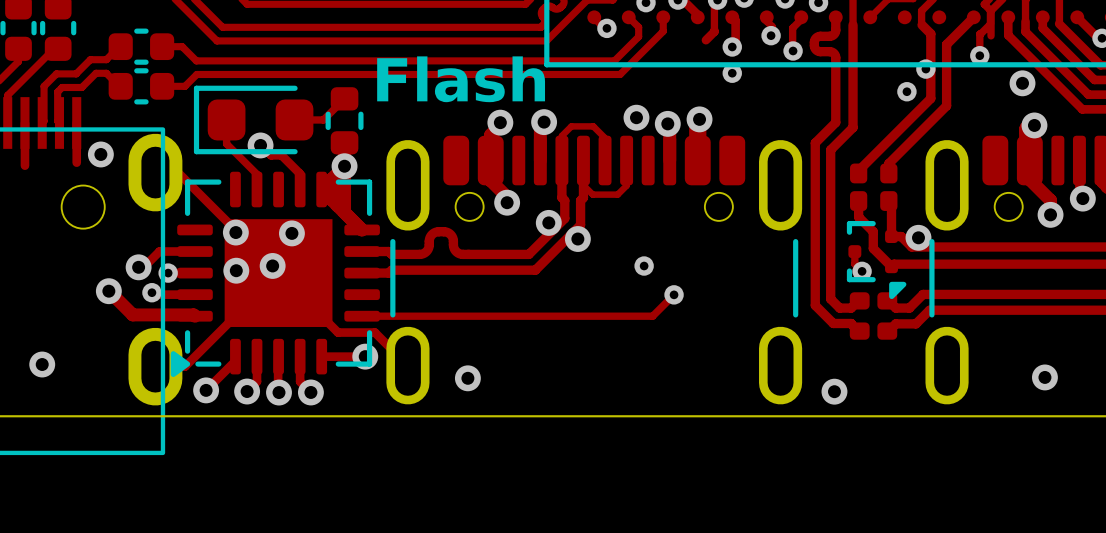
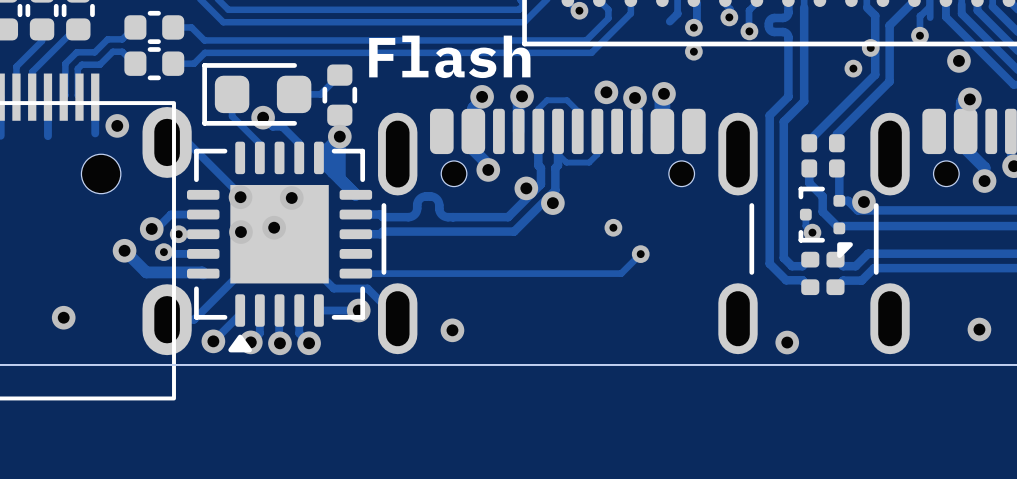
part footprint: [170, 171, 380, 378] -> [186, 141, 373, 353]

